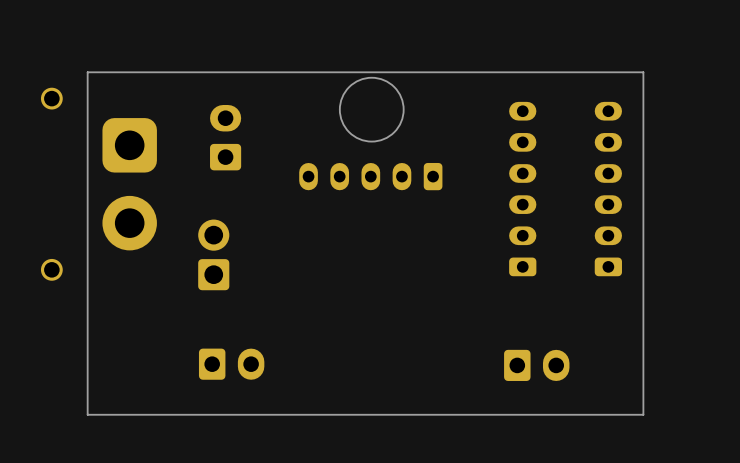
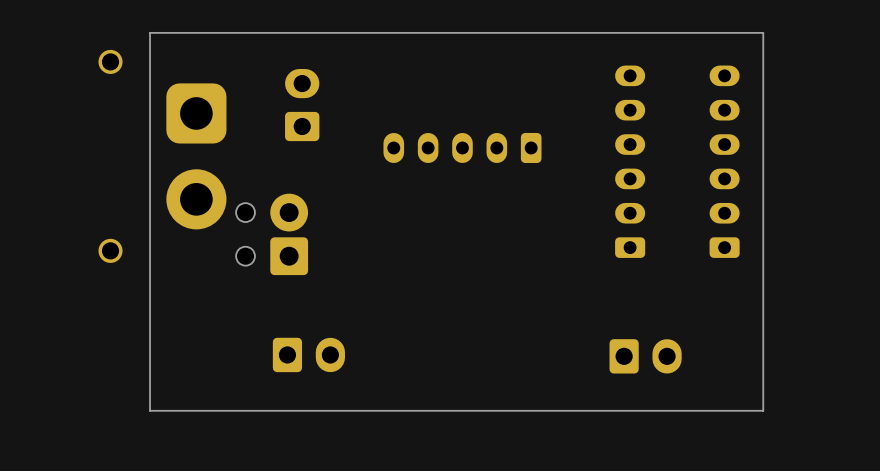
round board edge: [339, 77, 405, 142] -> none
part footprint: [198, 219, 230, 291] -> [236, 193, 309, 276]

